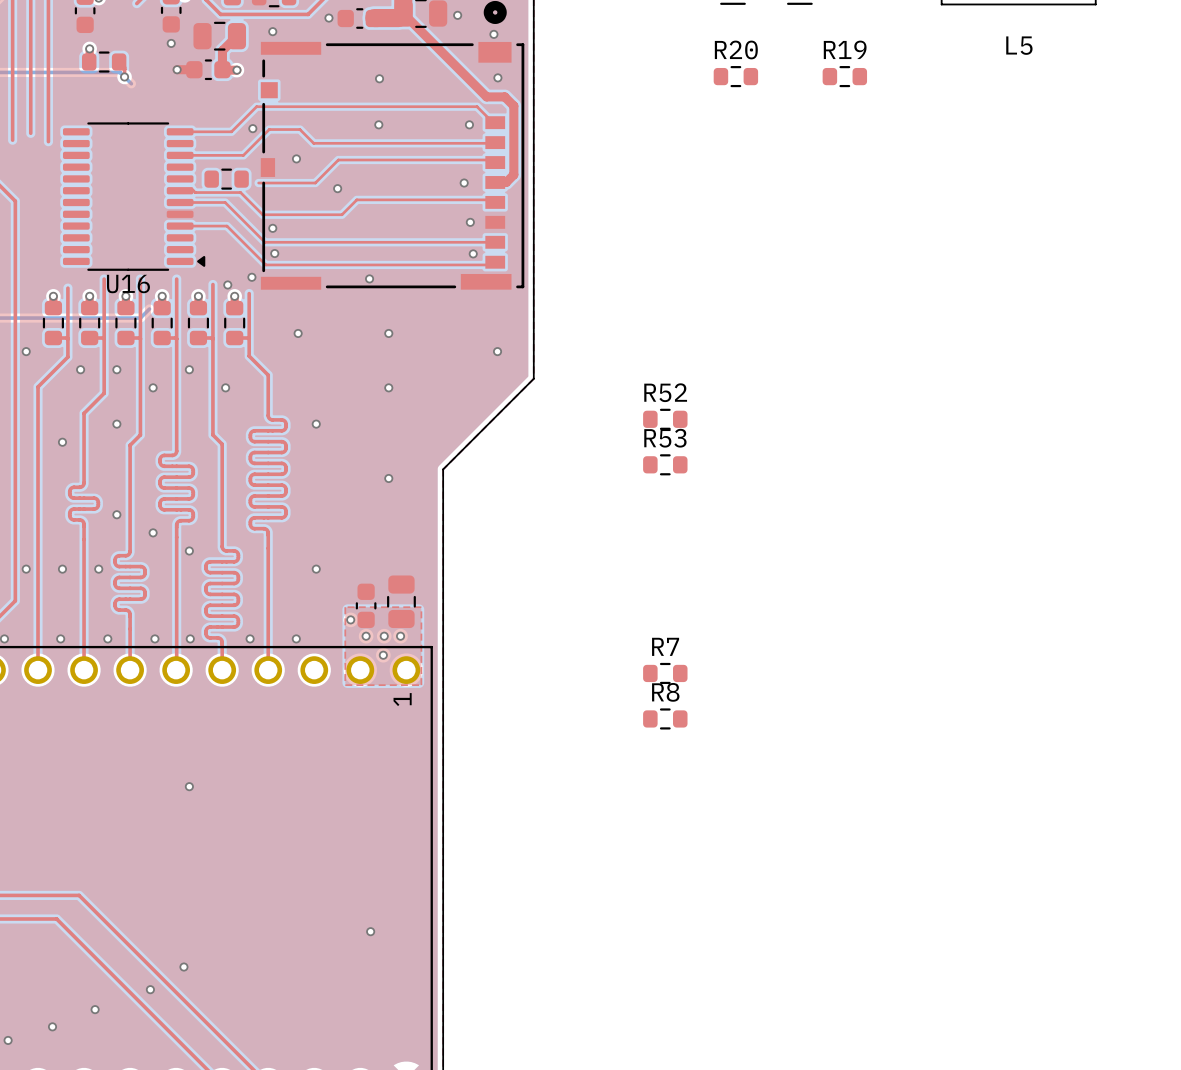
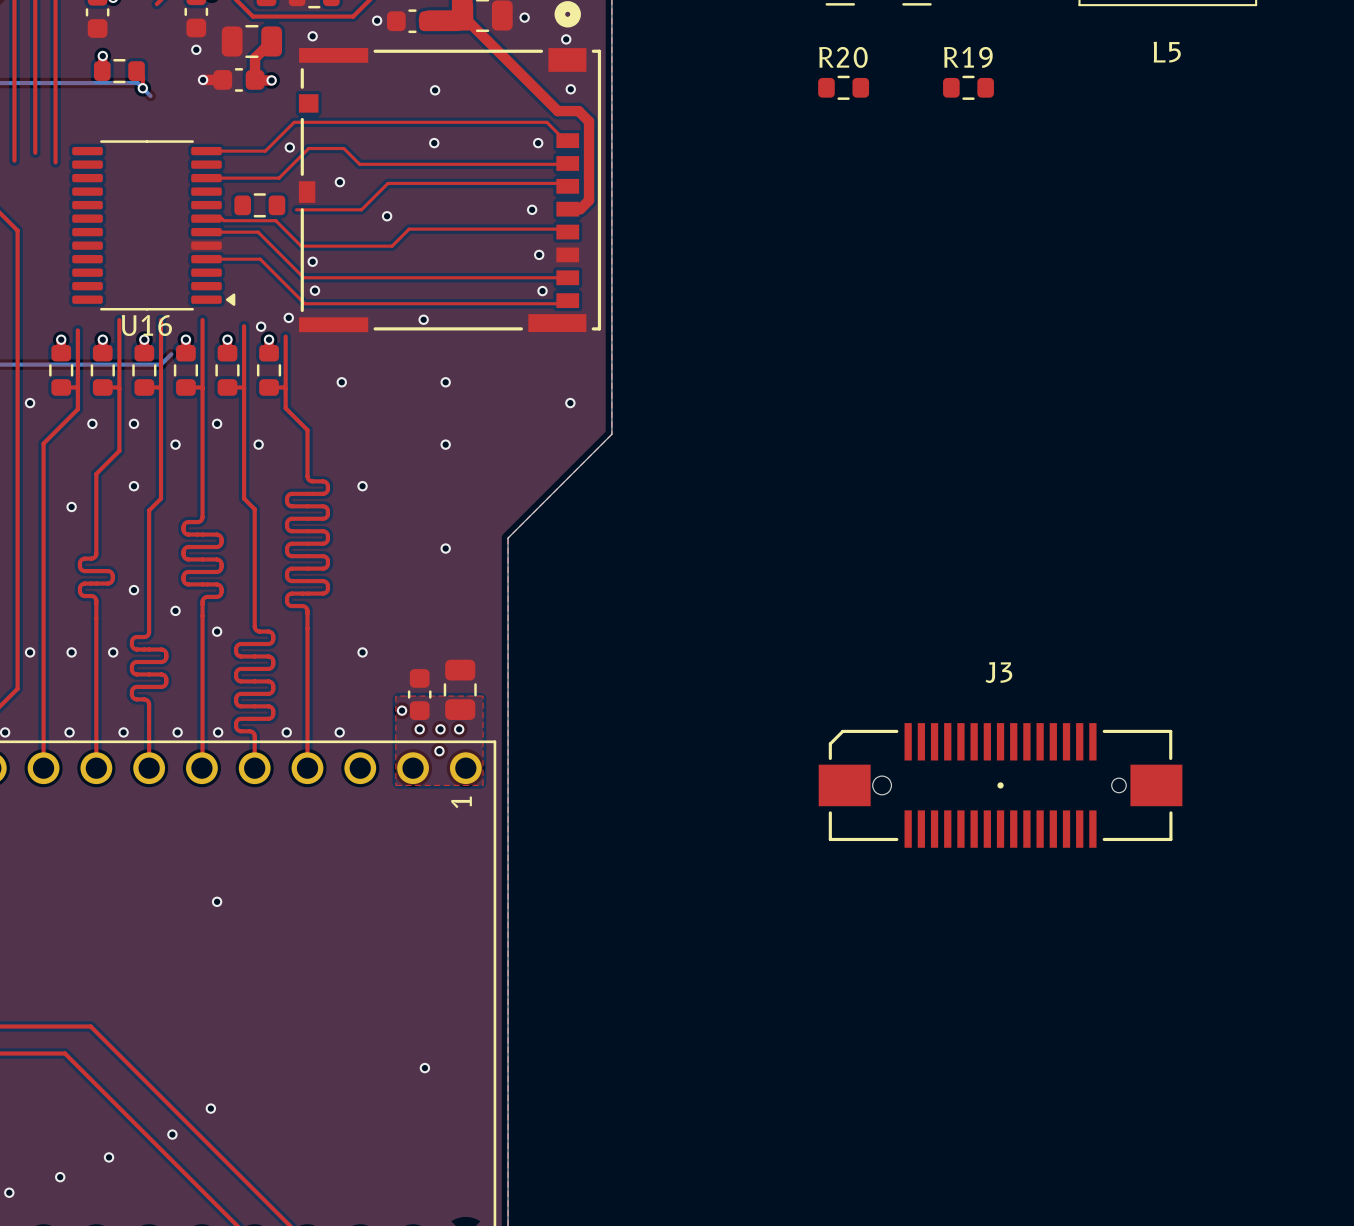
R52: (665, 419) -> none
R53: (665, 464) -> none
R7: (665, 673) -> none
J3: none -> (1000, 785)
R8: (665, 718) -> none

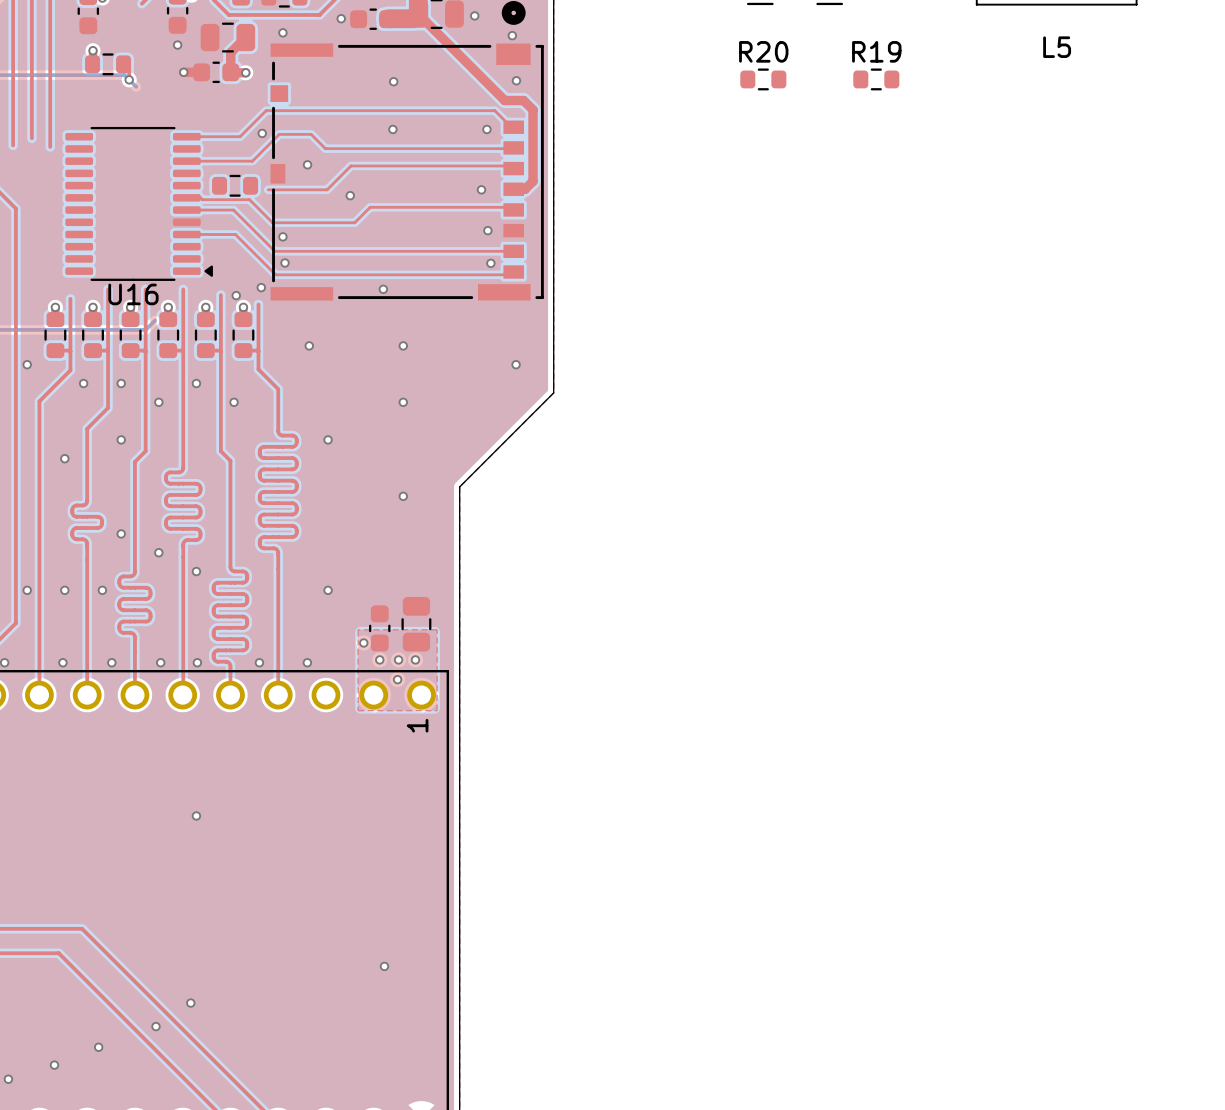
J3: (1000, 785) -> none

